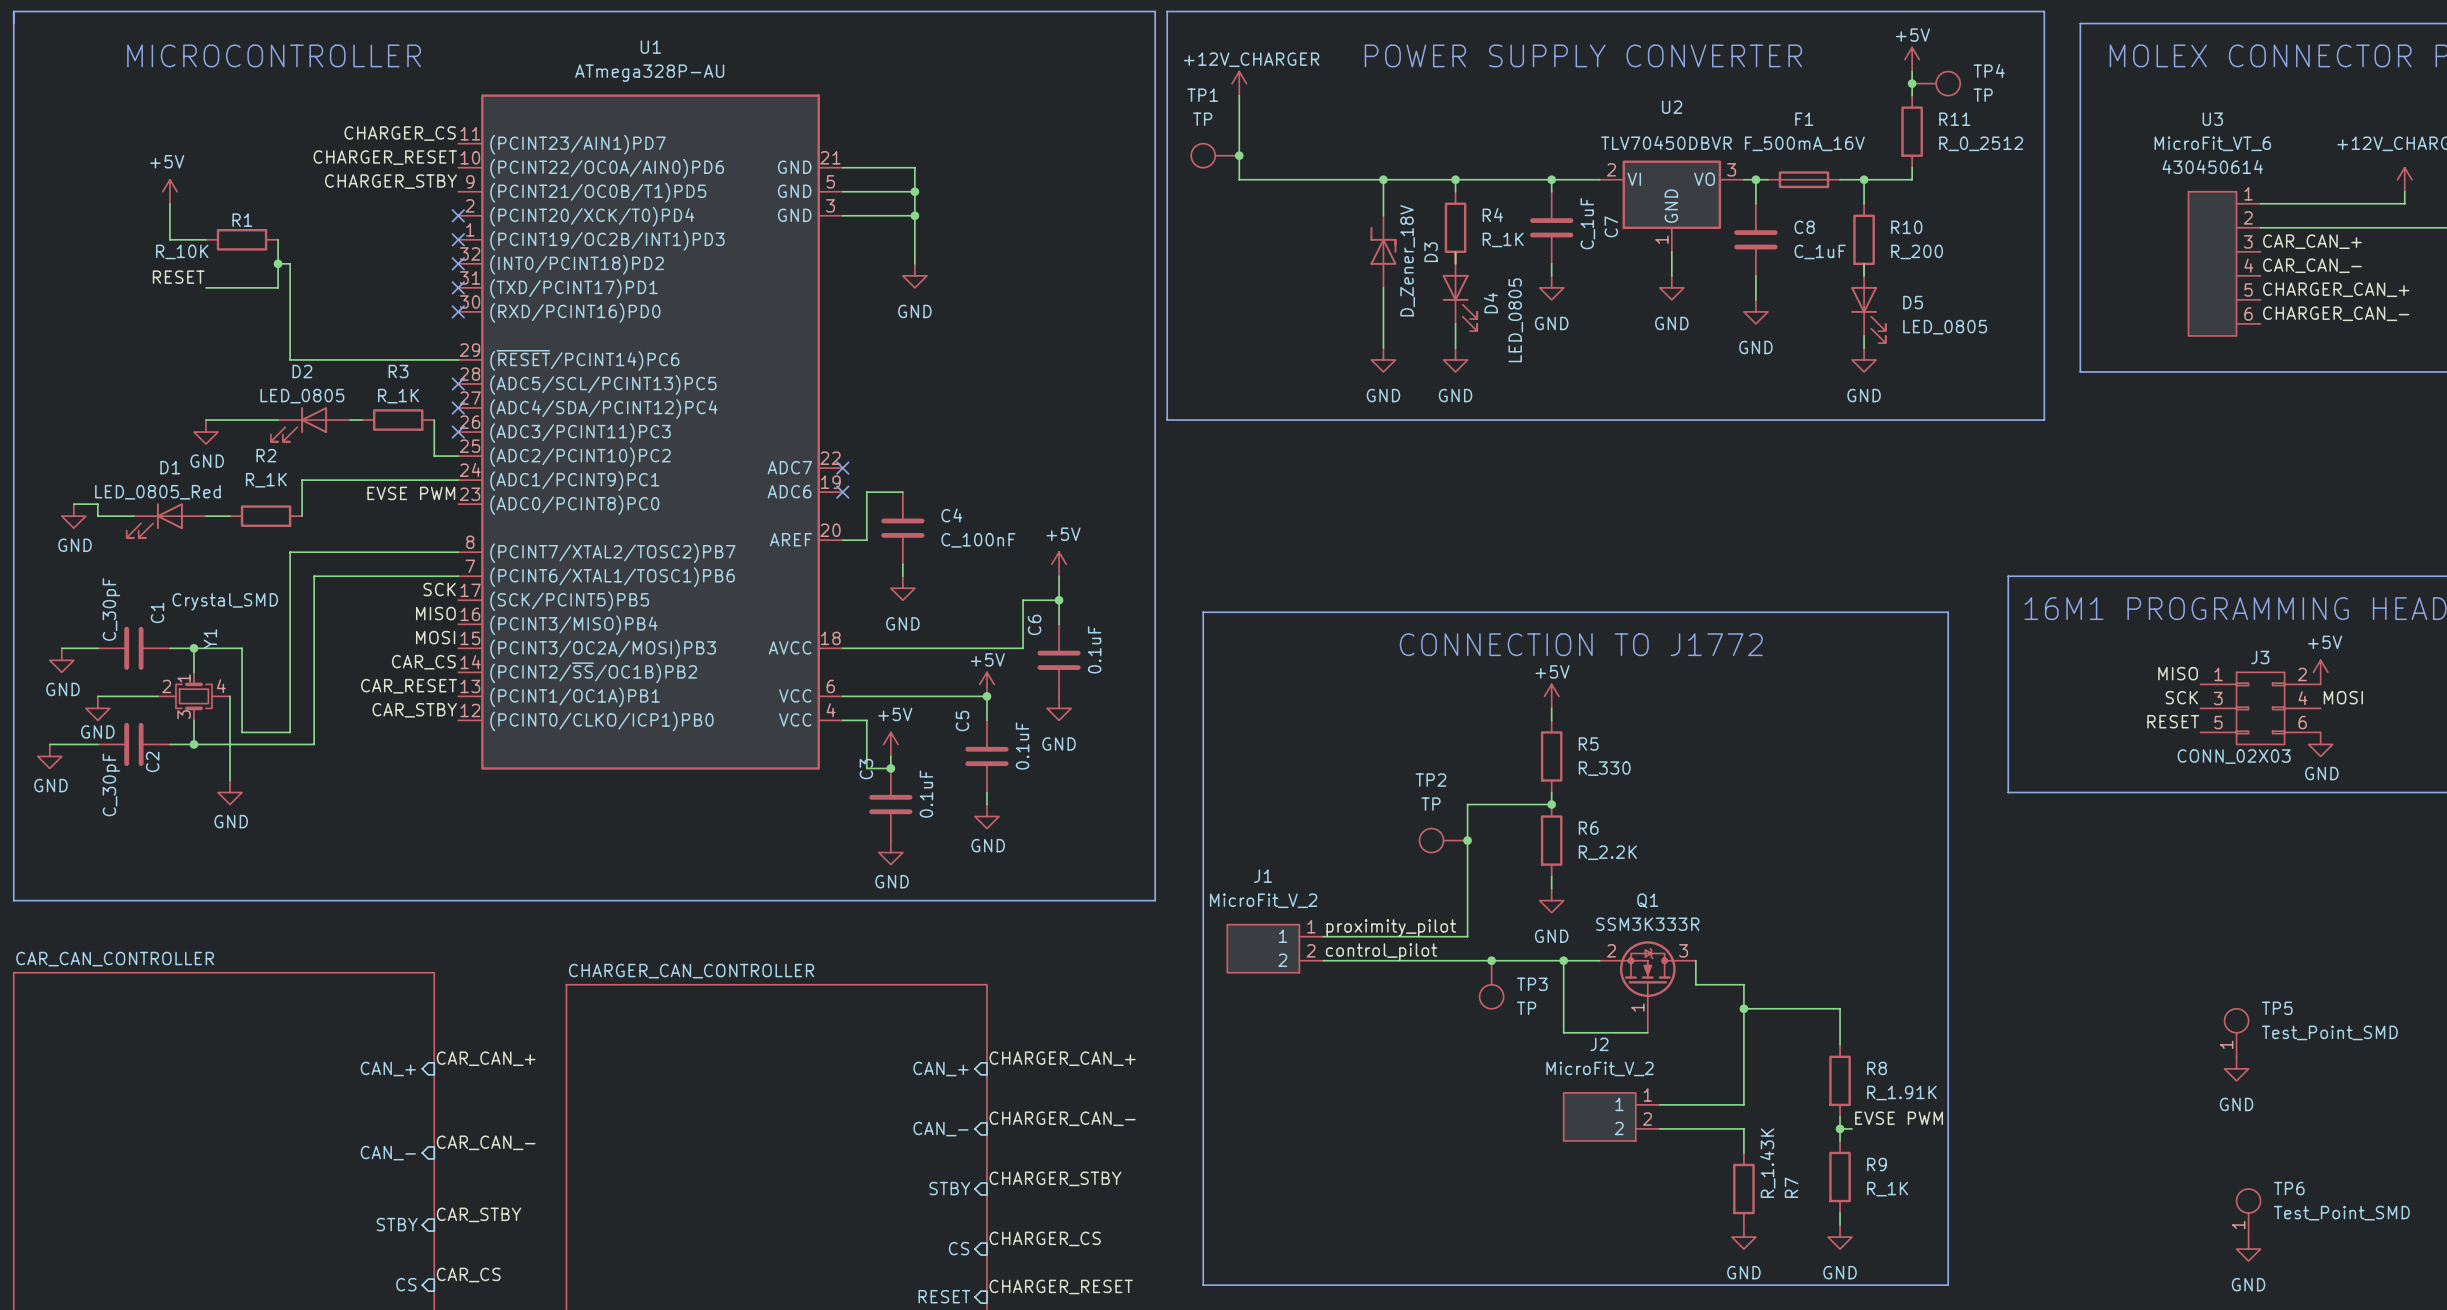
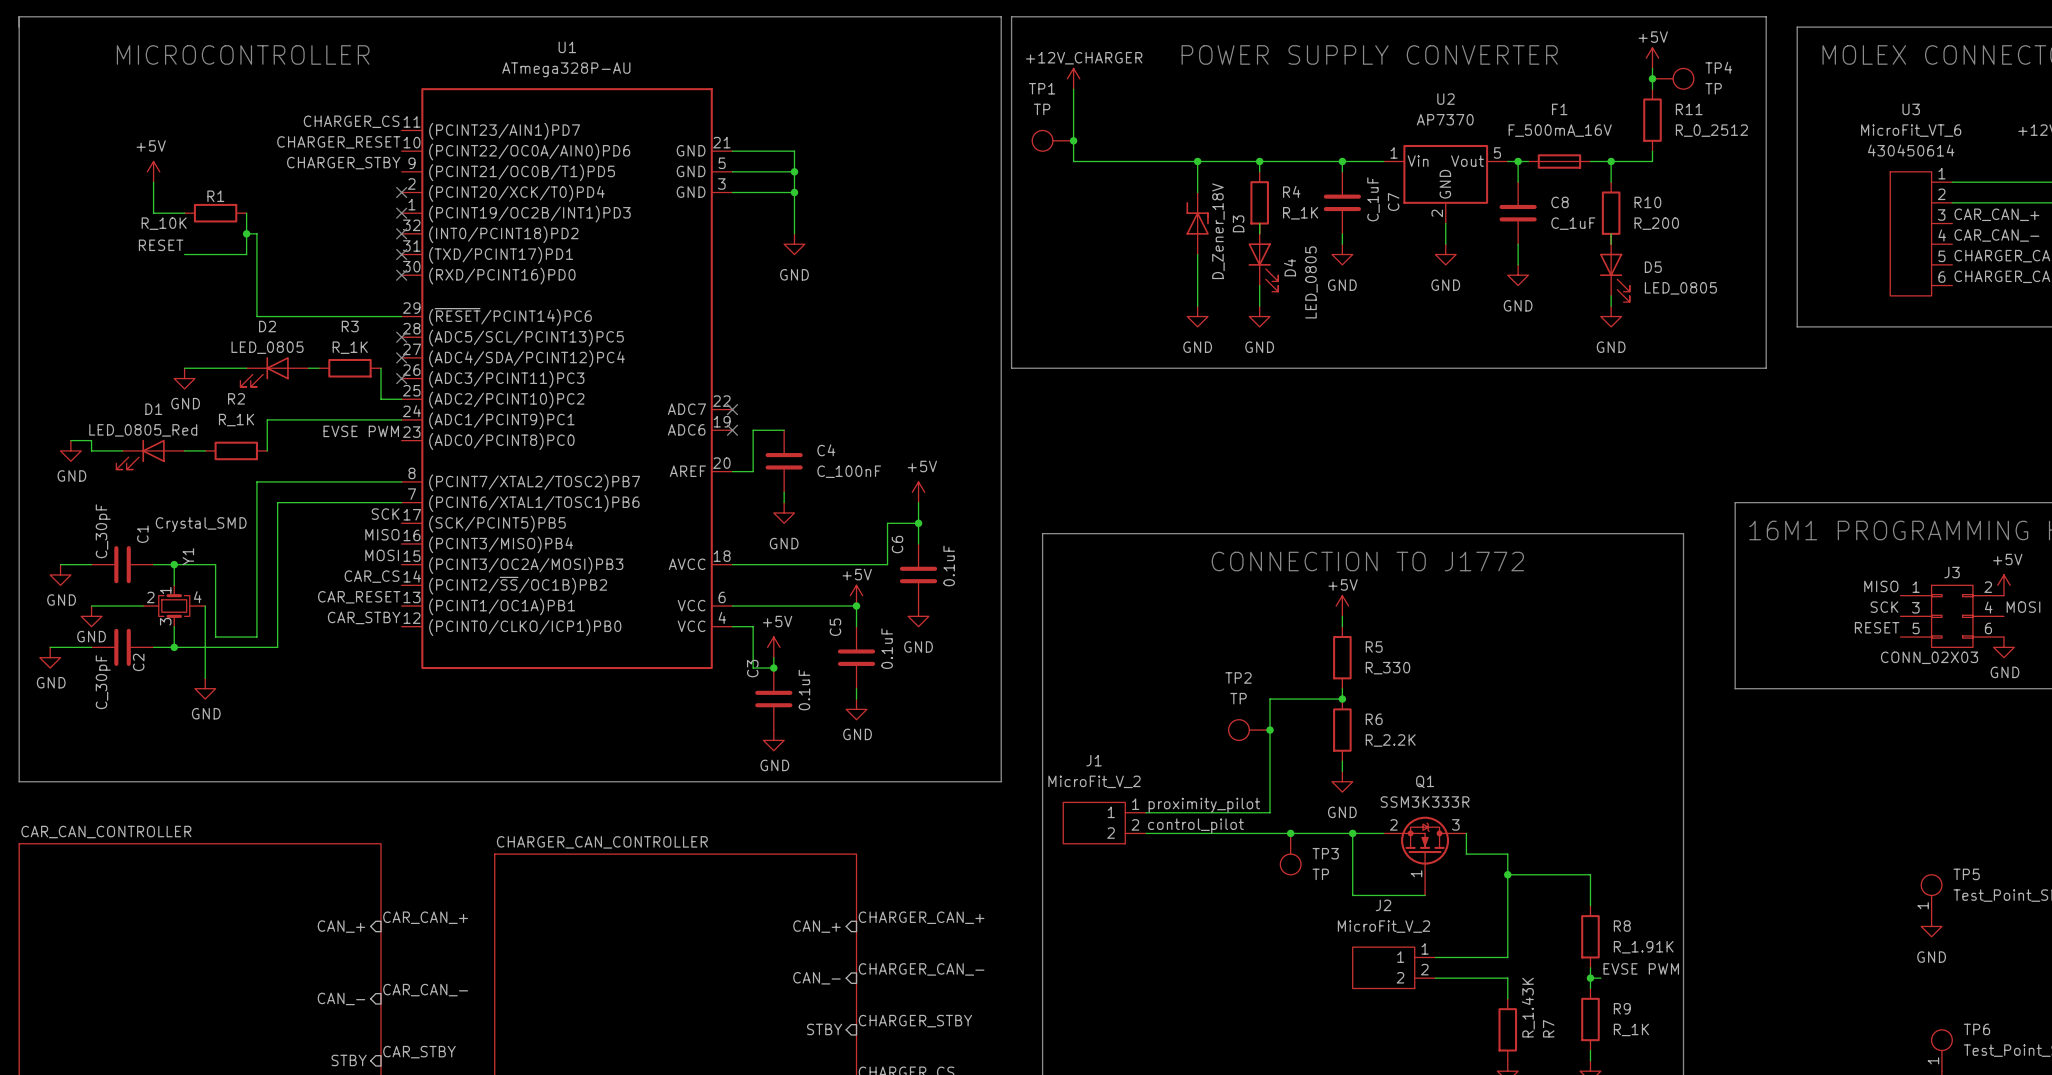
U2 value: TLV70450DBVR (1666, 142) -> AP7370 (1445, 119)
U2 pin number: 2 (1611, 169) -> 1 (1394, 152)
U2 pin number: 3 (1731, 169) -> 5 (1497, 152)
U2 pin name: VI (1634, 179) -> Vin (1418, 161)
U2 pin name: VO (1704, 179) -> Vout (1467, 161)
U2 pin number: 1 (1661, 239) -> 2 (1437, 213)

